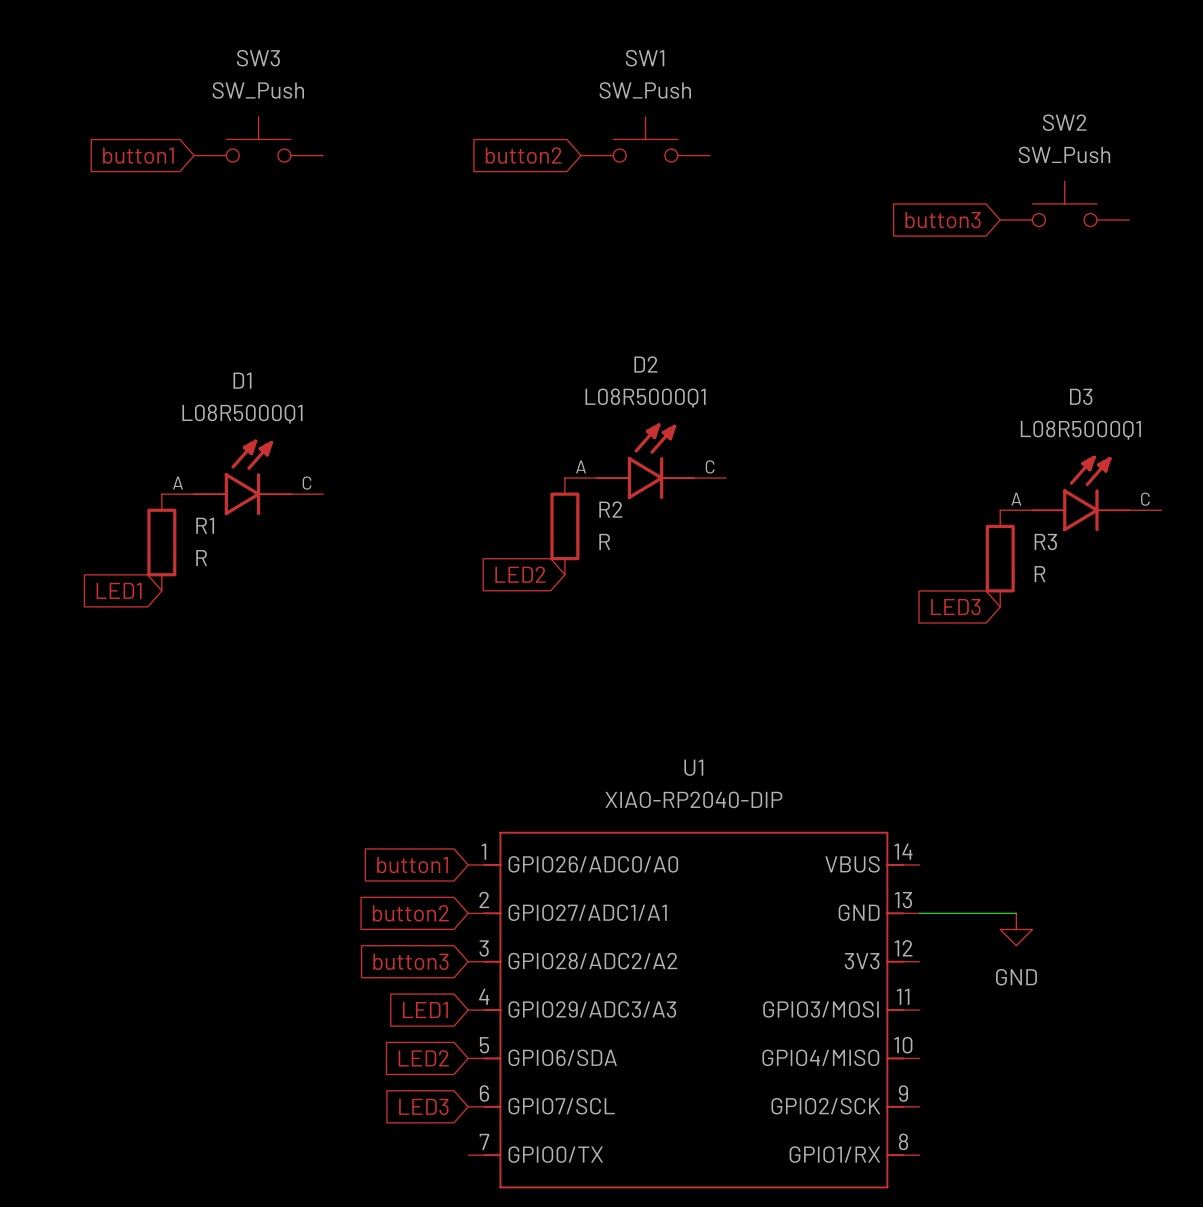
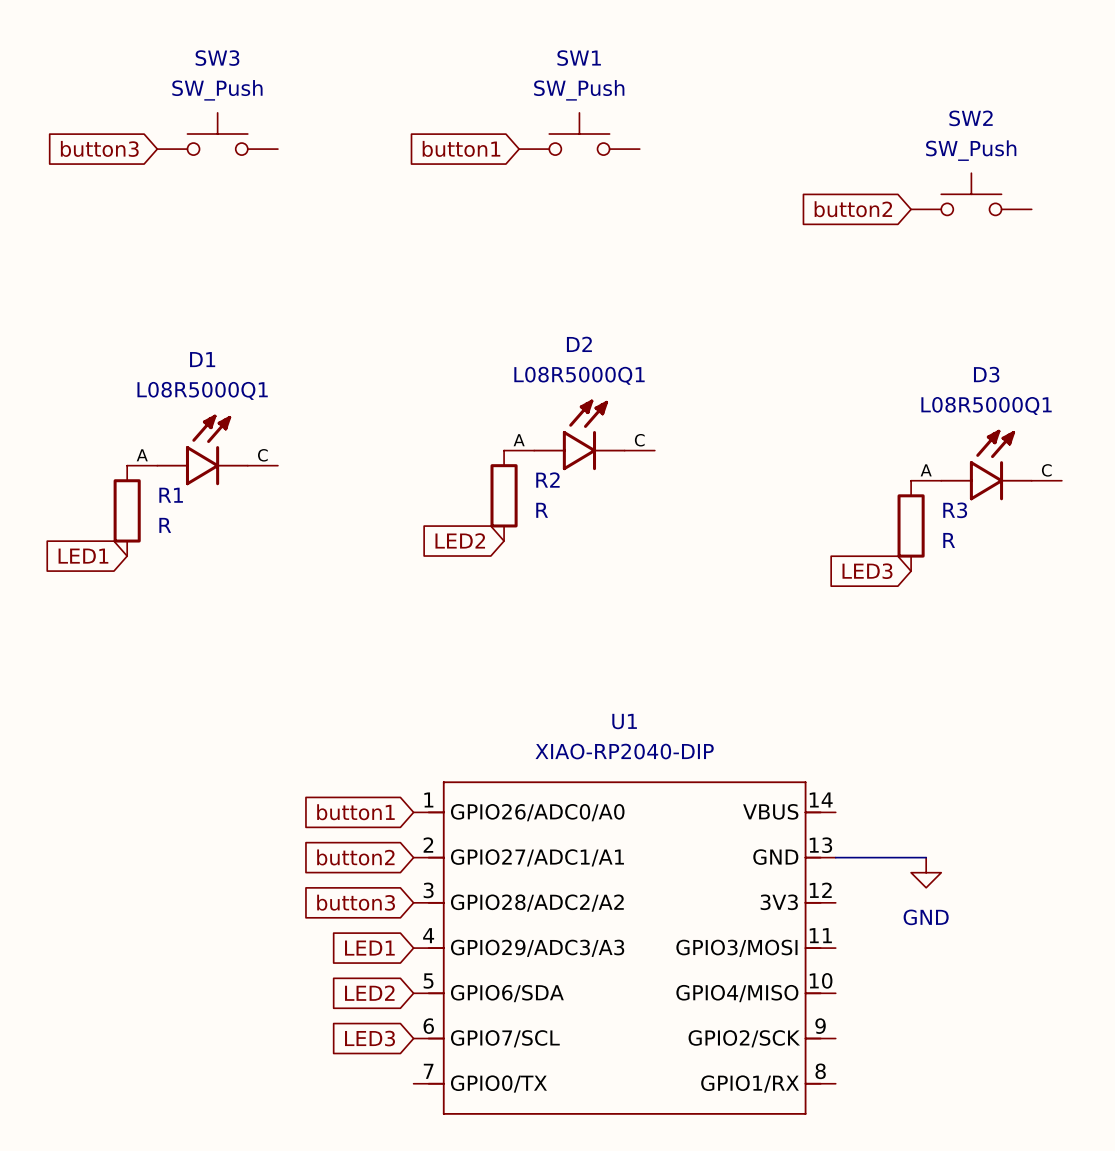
global label: button1 (138, 155) -> button3 (99, 148)
global label: button2 (523, 155) -> button1 (461, 148)
global label: button3 (943, 220) -> button2 (853, 209)

